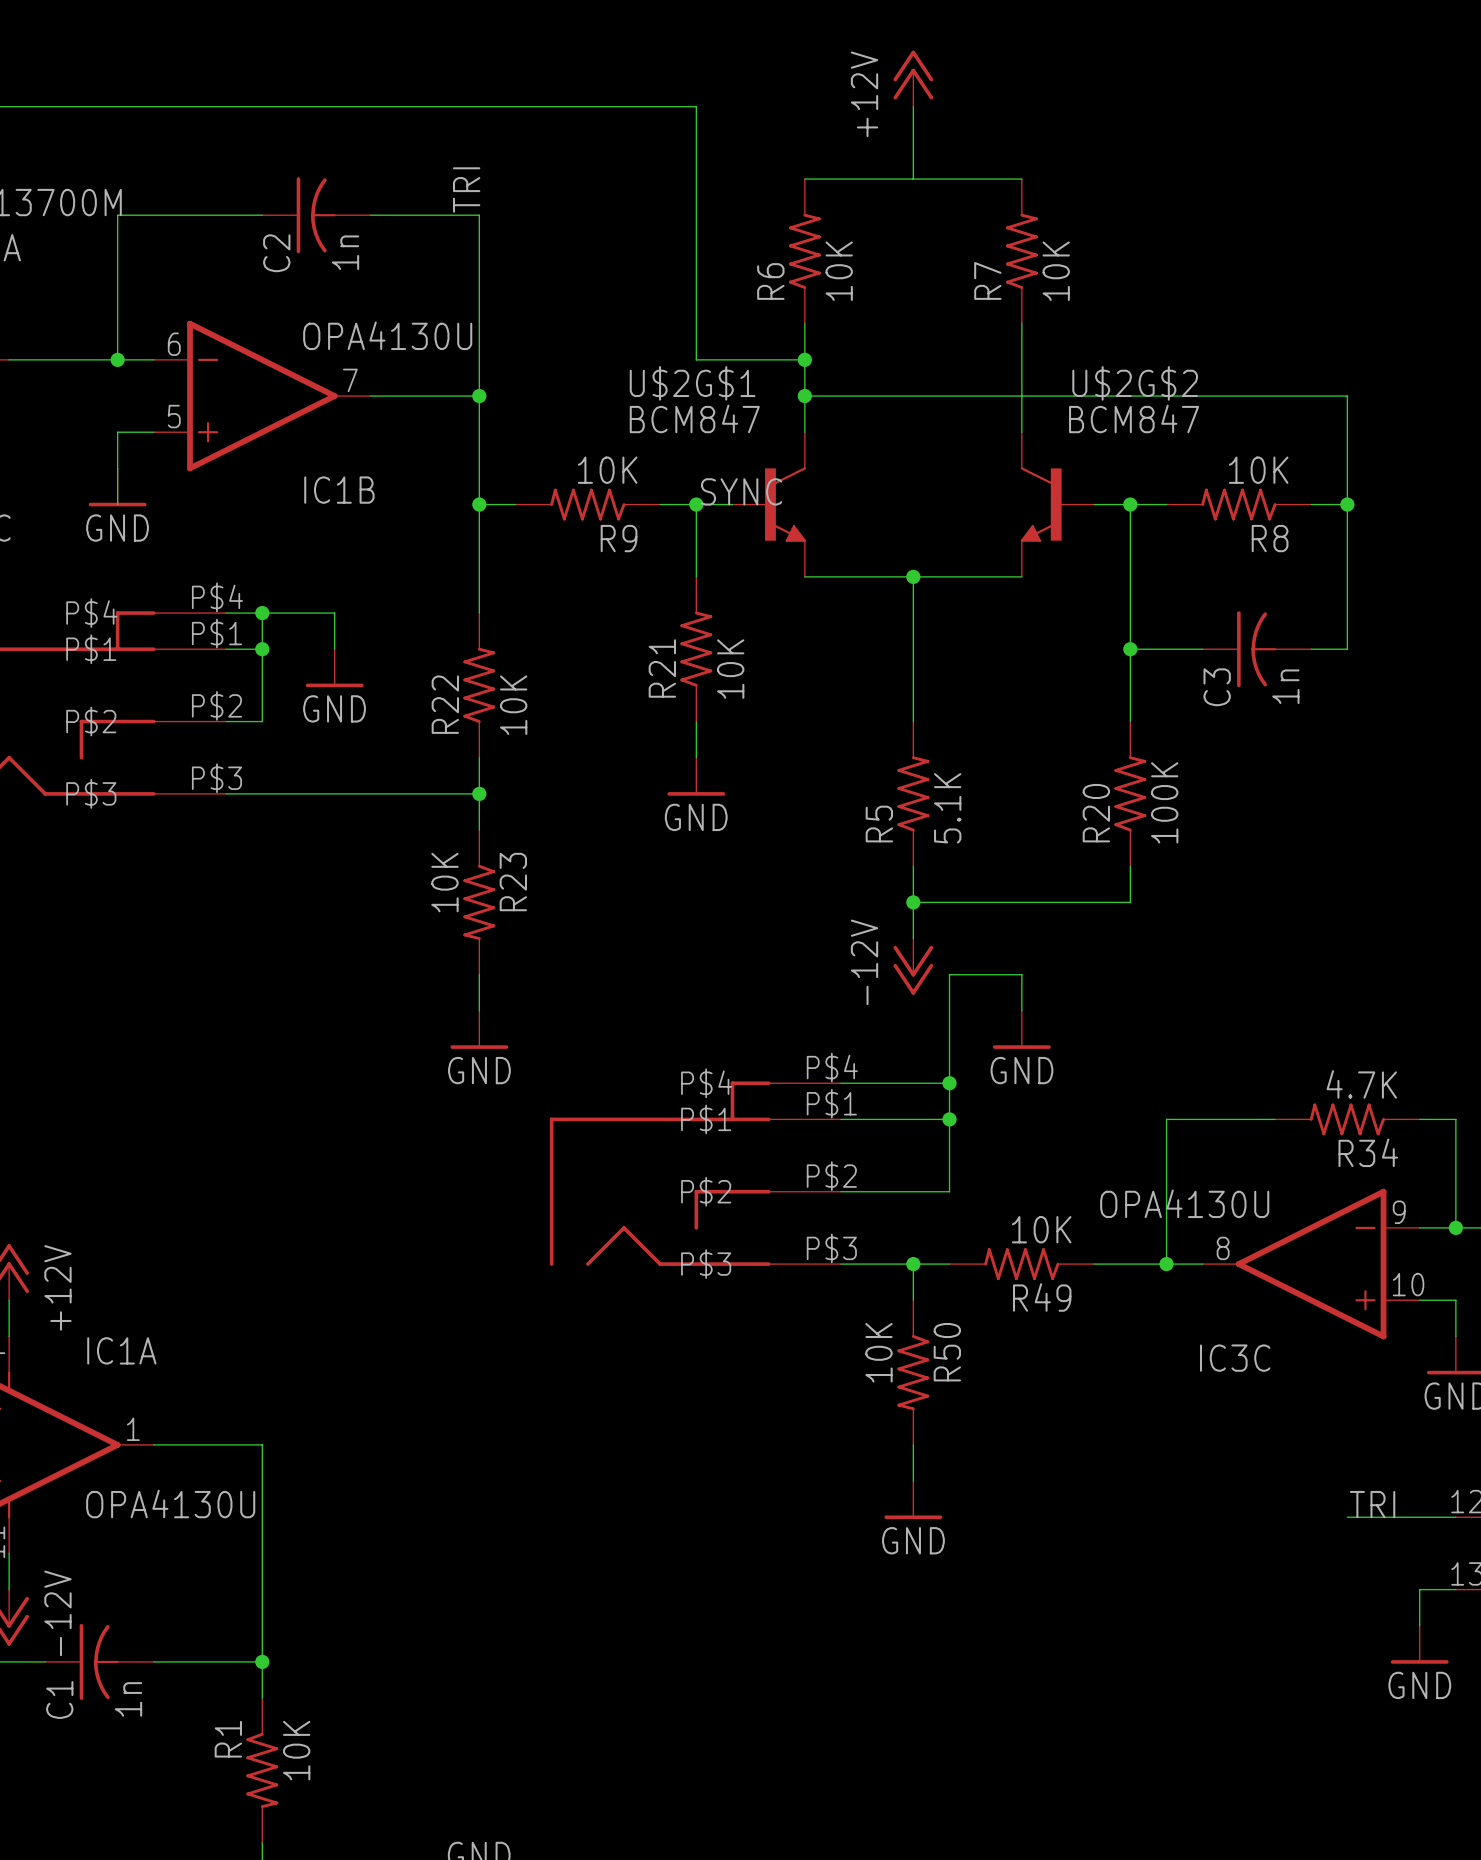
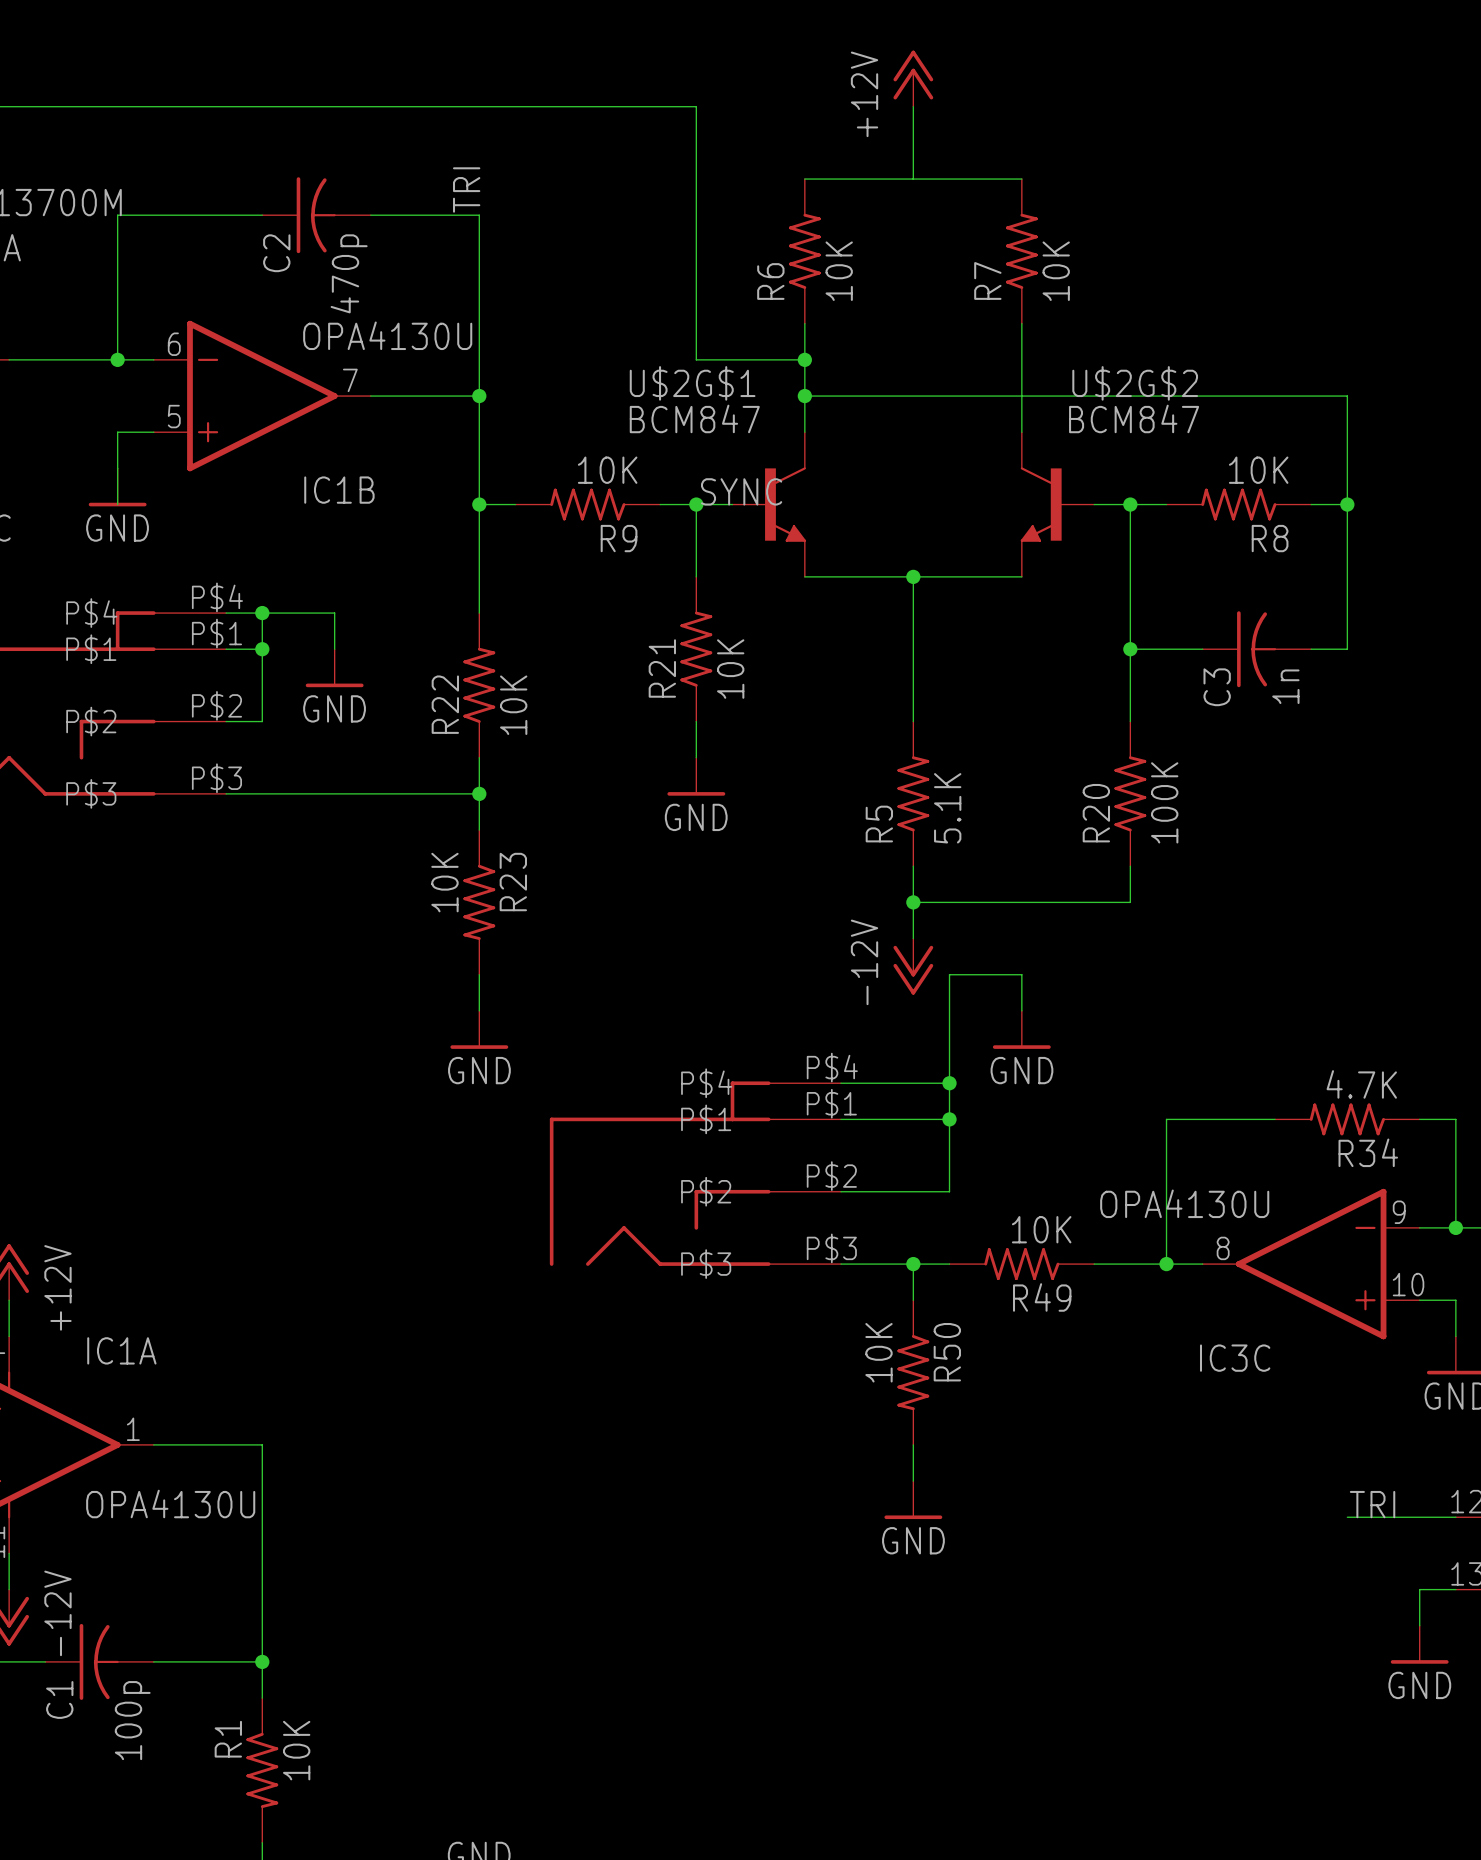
C2 value: 1n (345, 252) -> 470p (349, 273)
C1 value: 1n (128, 1699) -> 100p (132, 1720)

